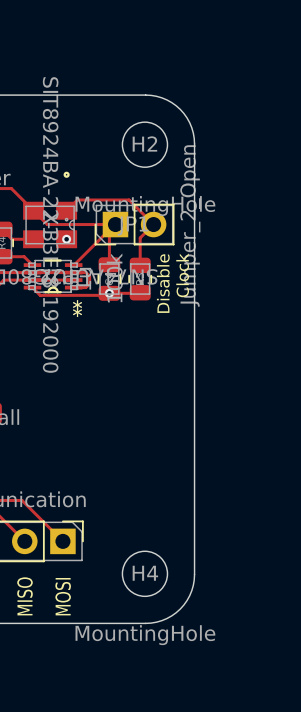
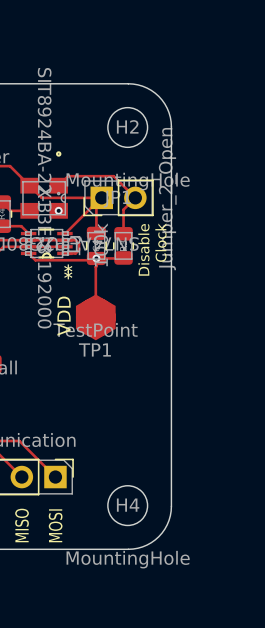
track: none -> (96, 258) (95, 317)
text: none -> VDD (64, 316)
TP1: none -> TestPoint (95, 317)

